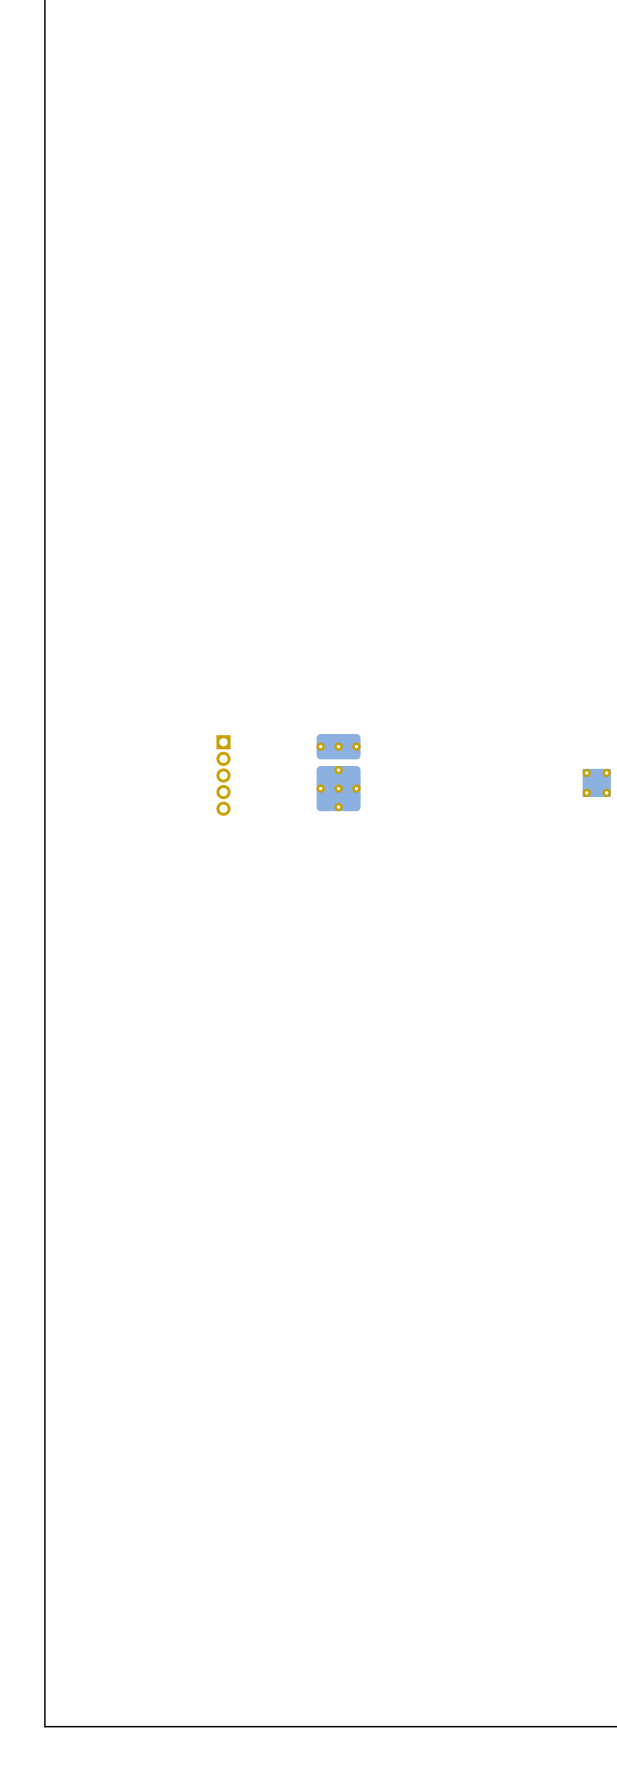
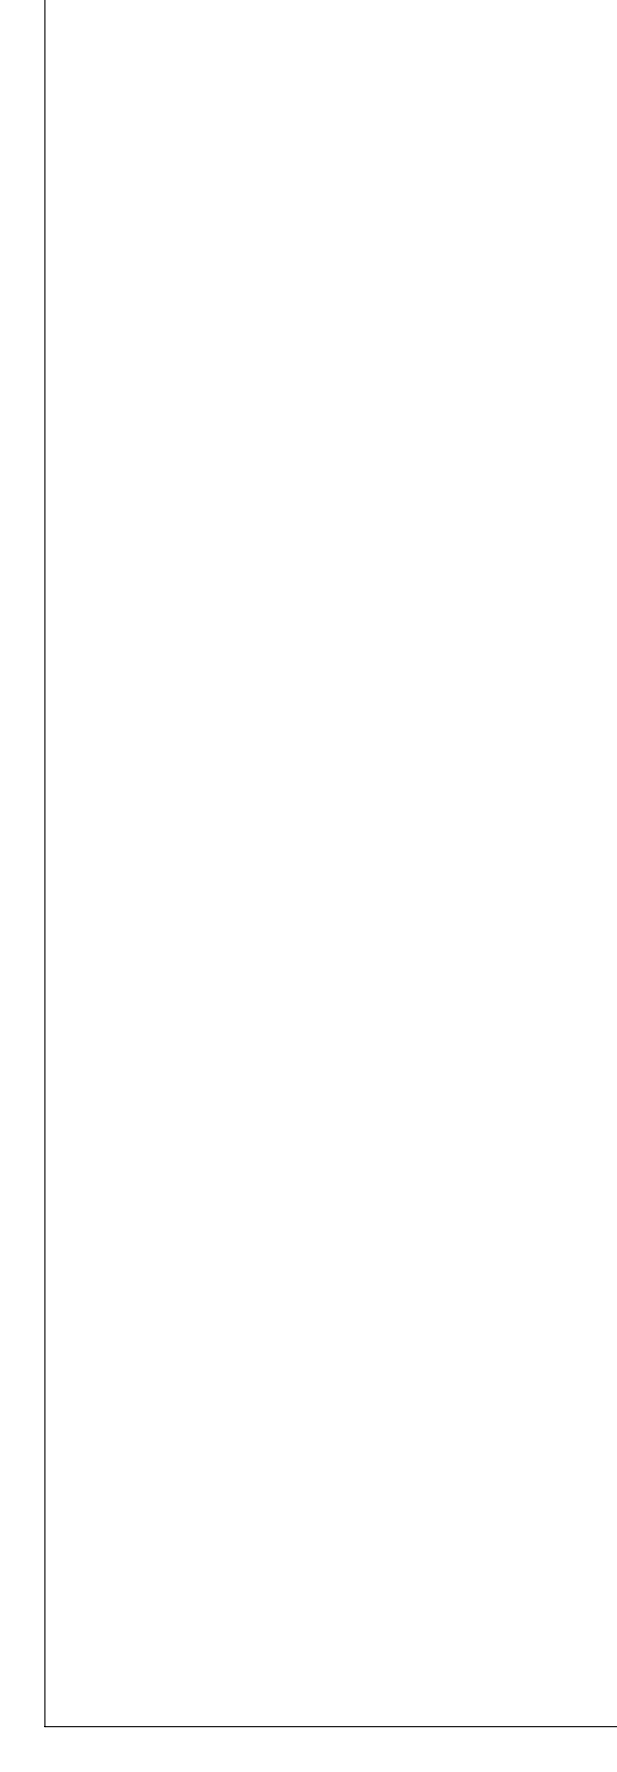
part: (338, 772) -> none
part: (223, 775) -> none
part: (596, 782) -> none

